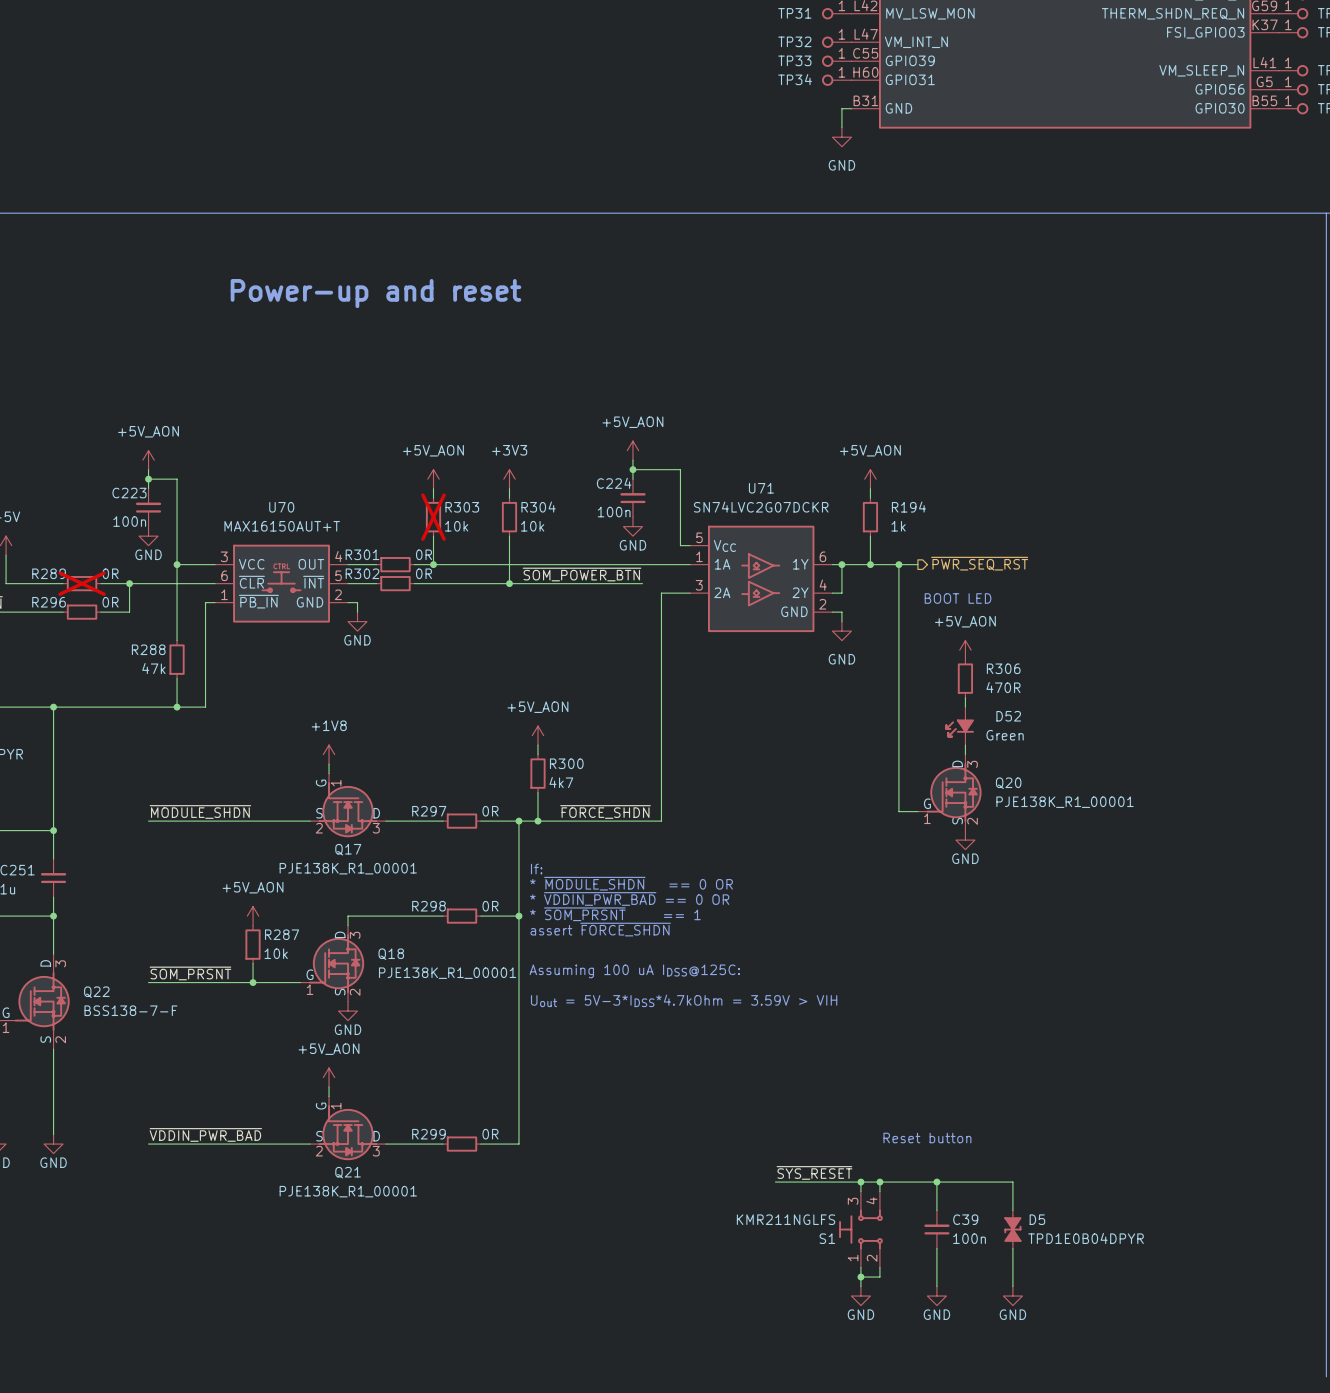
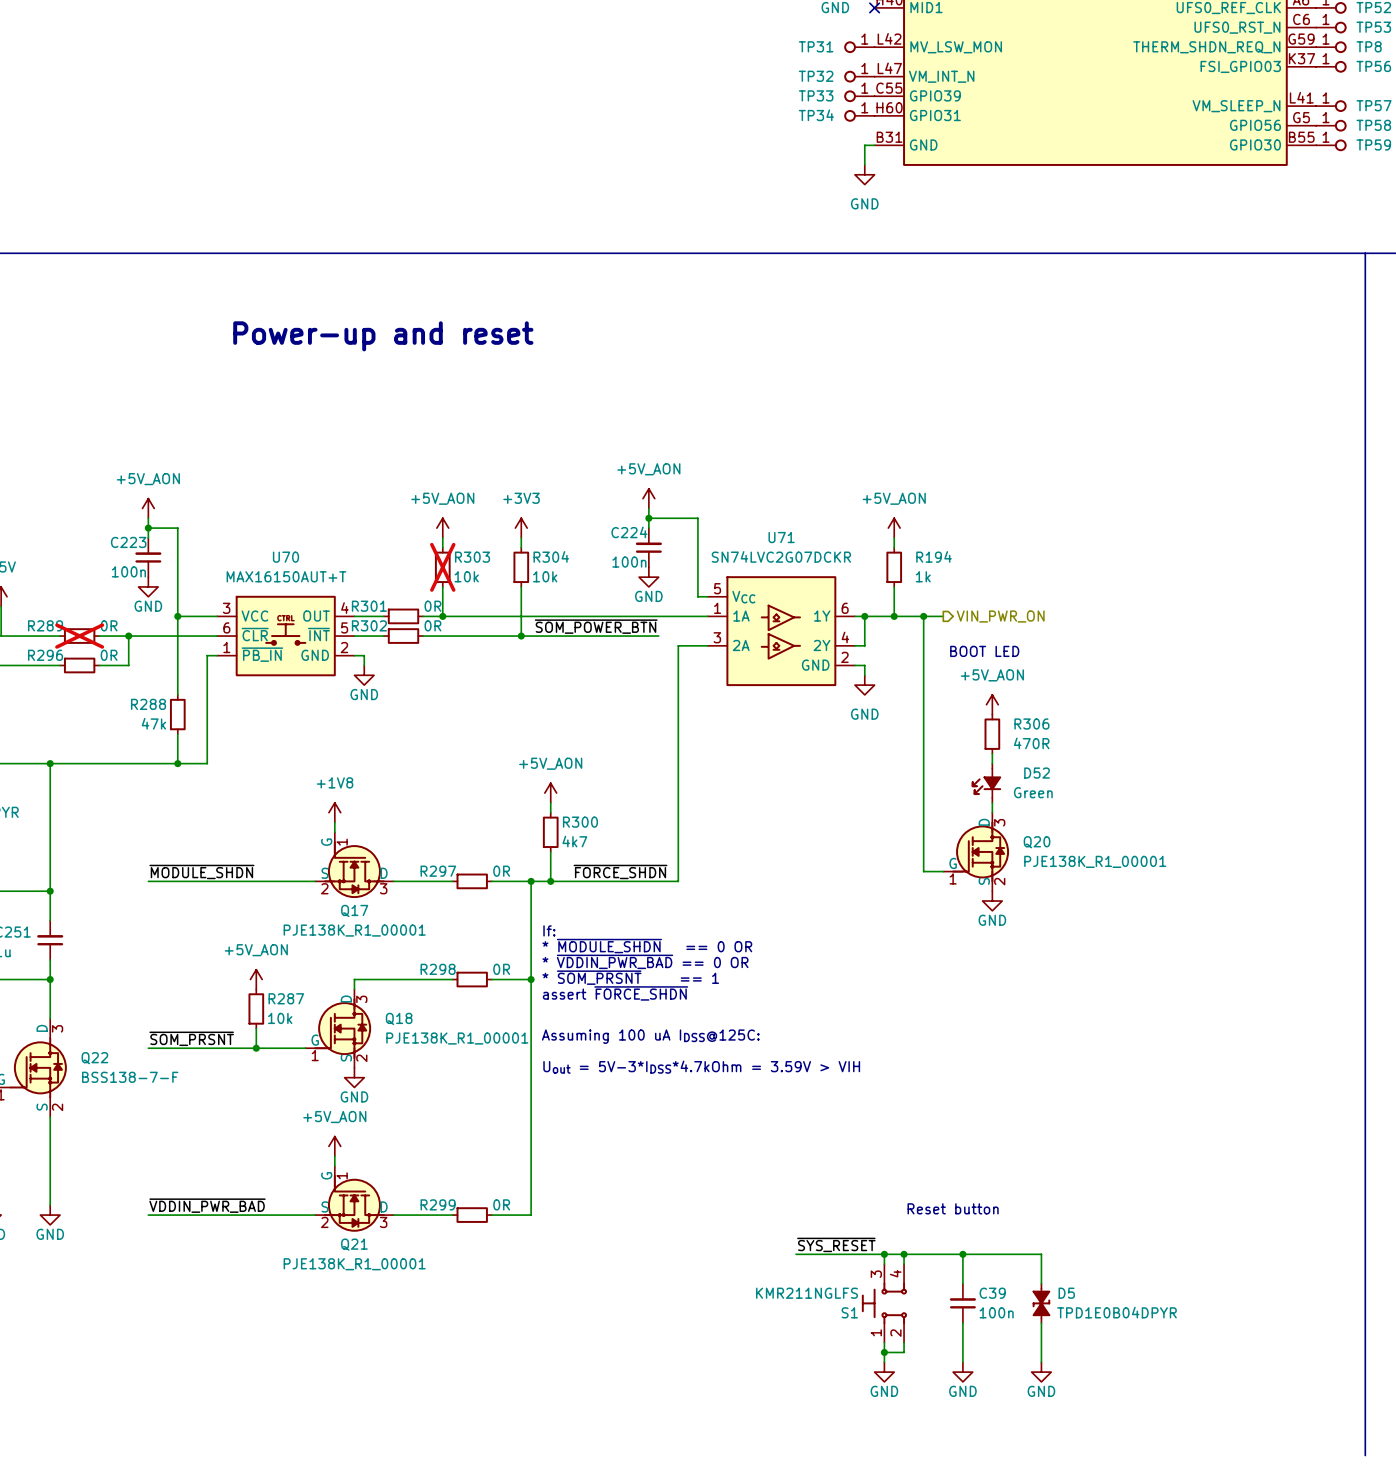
hierarchical label: ~{PWR_SEQ_RST} (979, 563) -> VIN_PWR_ON (1000, 616)

